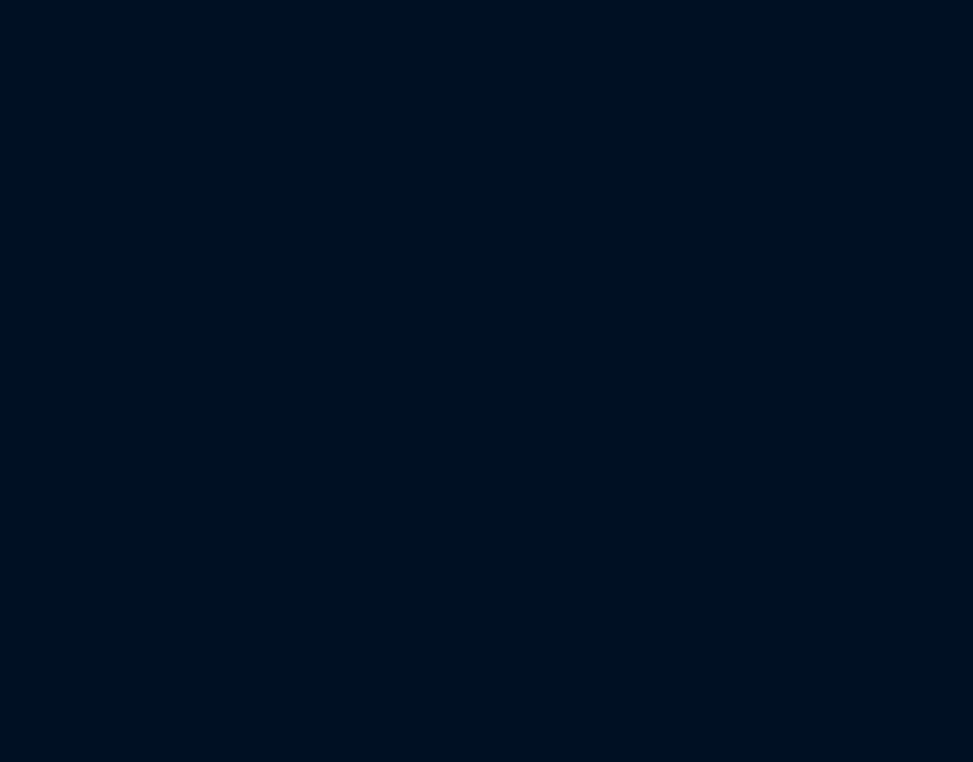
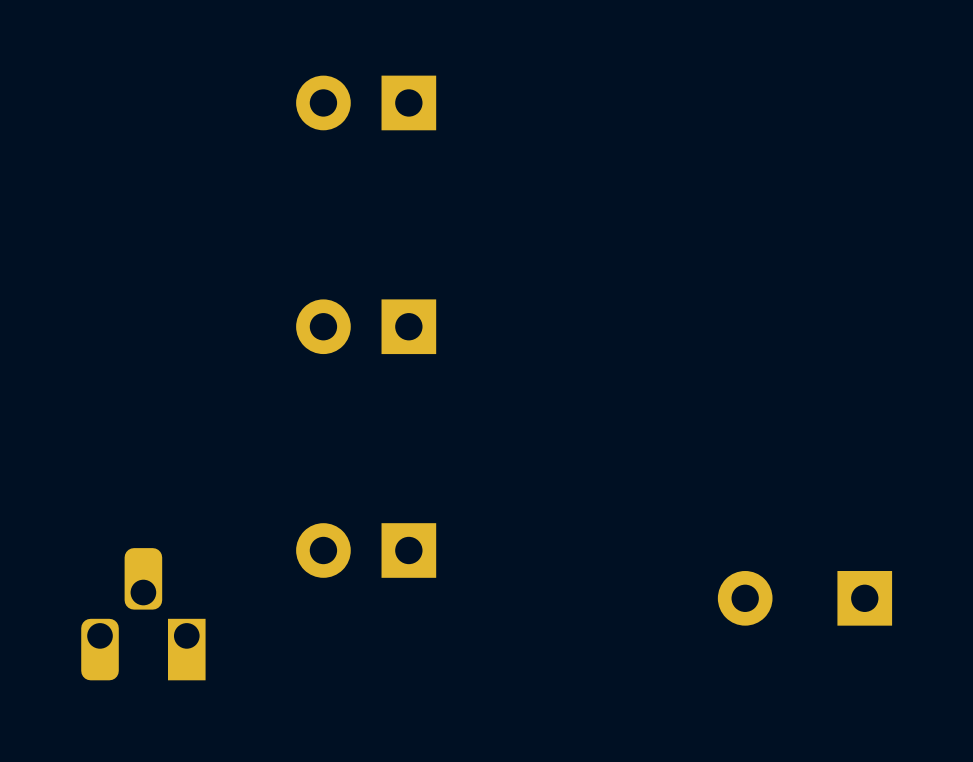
part: none -> (366, 102)
part: none -> (366, 326)
part: none -> (366, 550)
part: none -> (804, 598)
part: none -> (143, 614)

